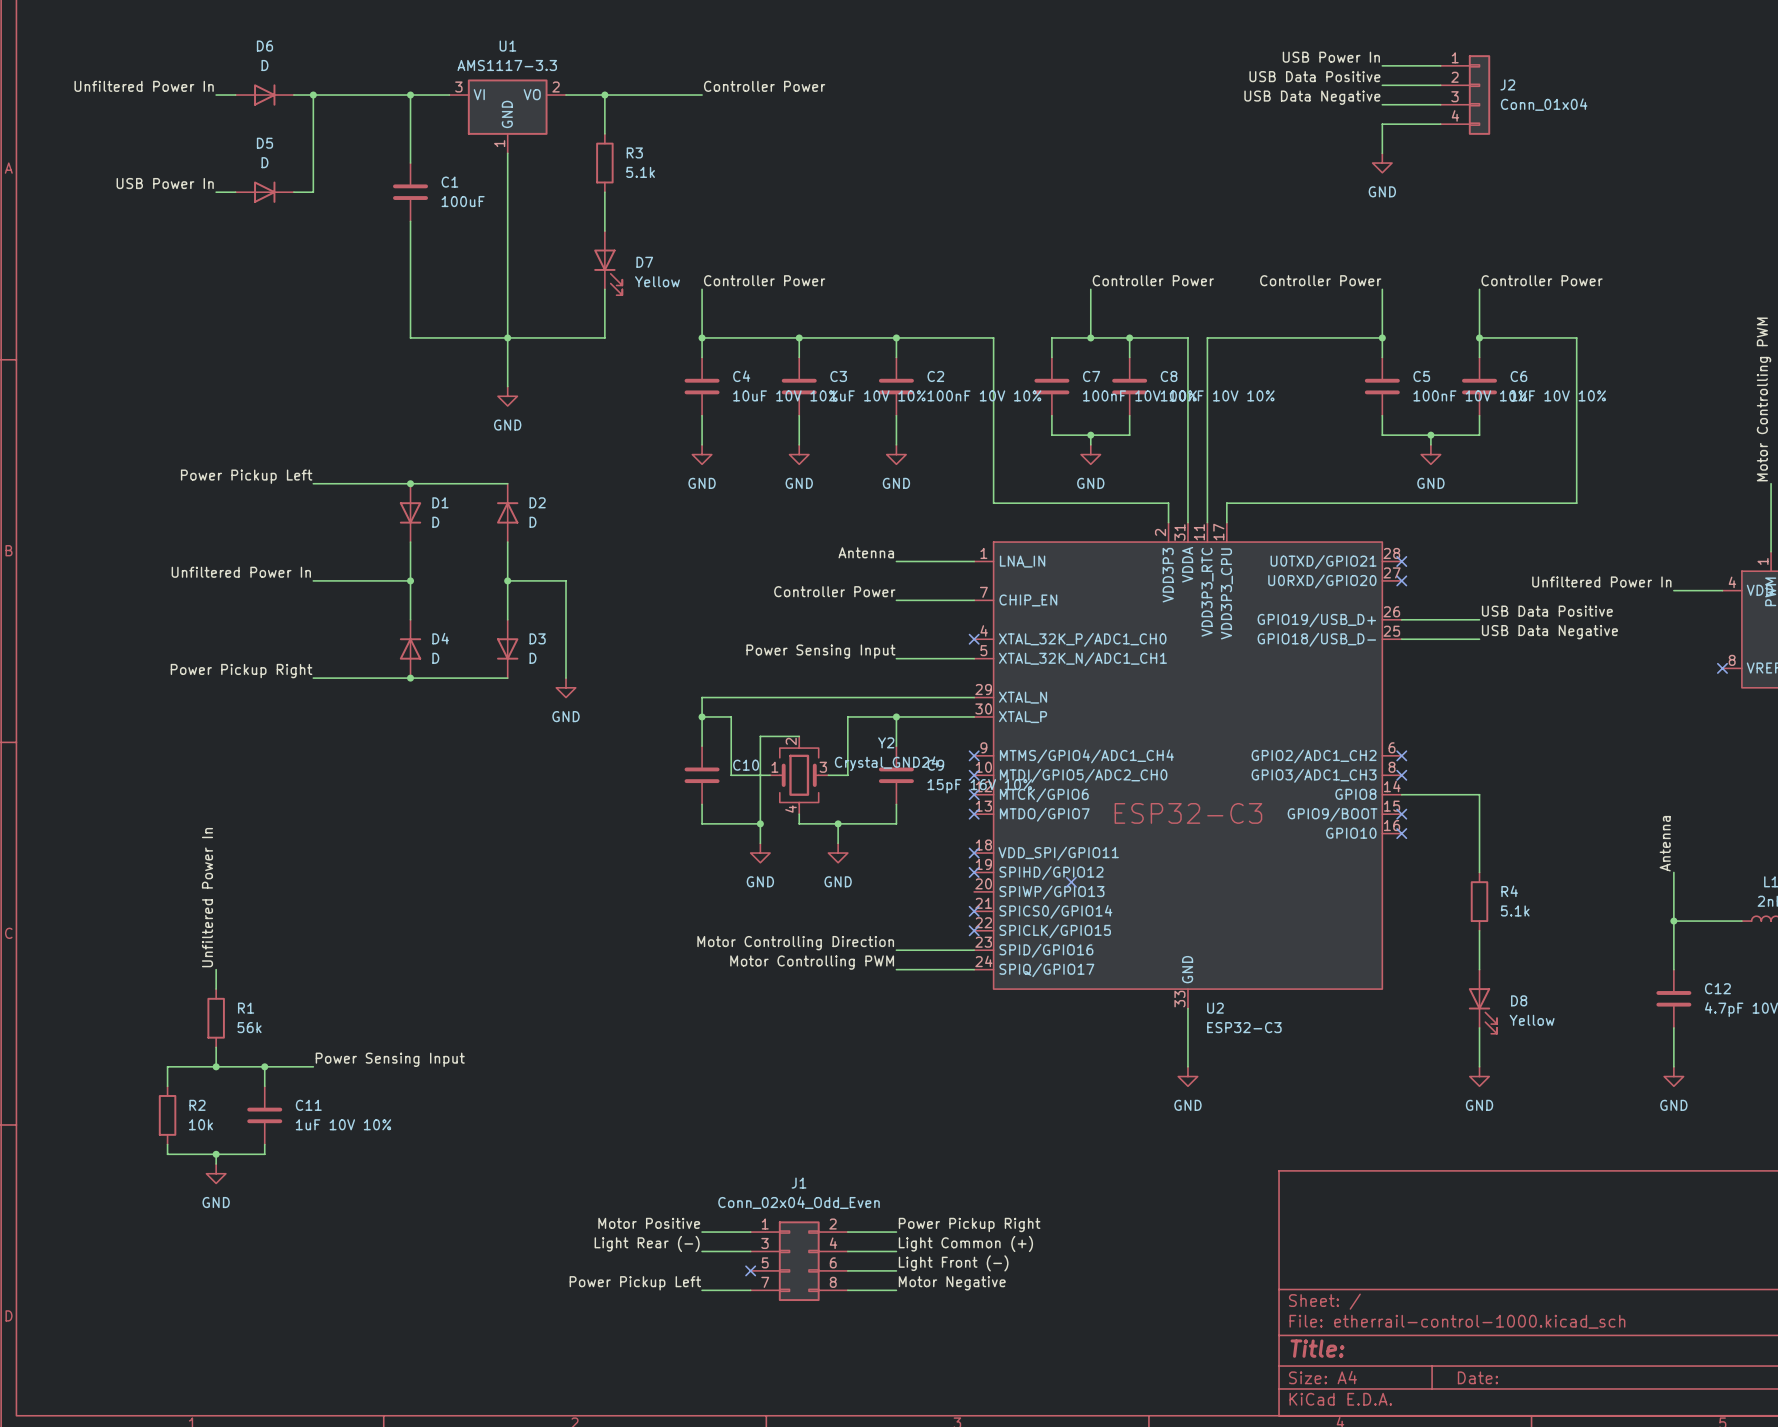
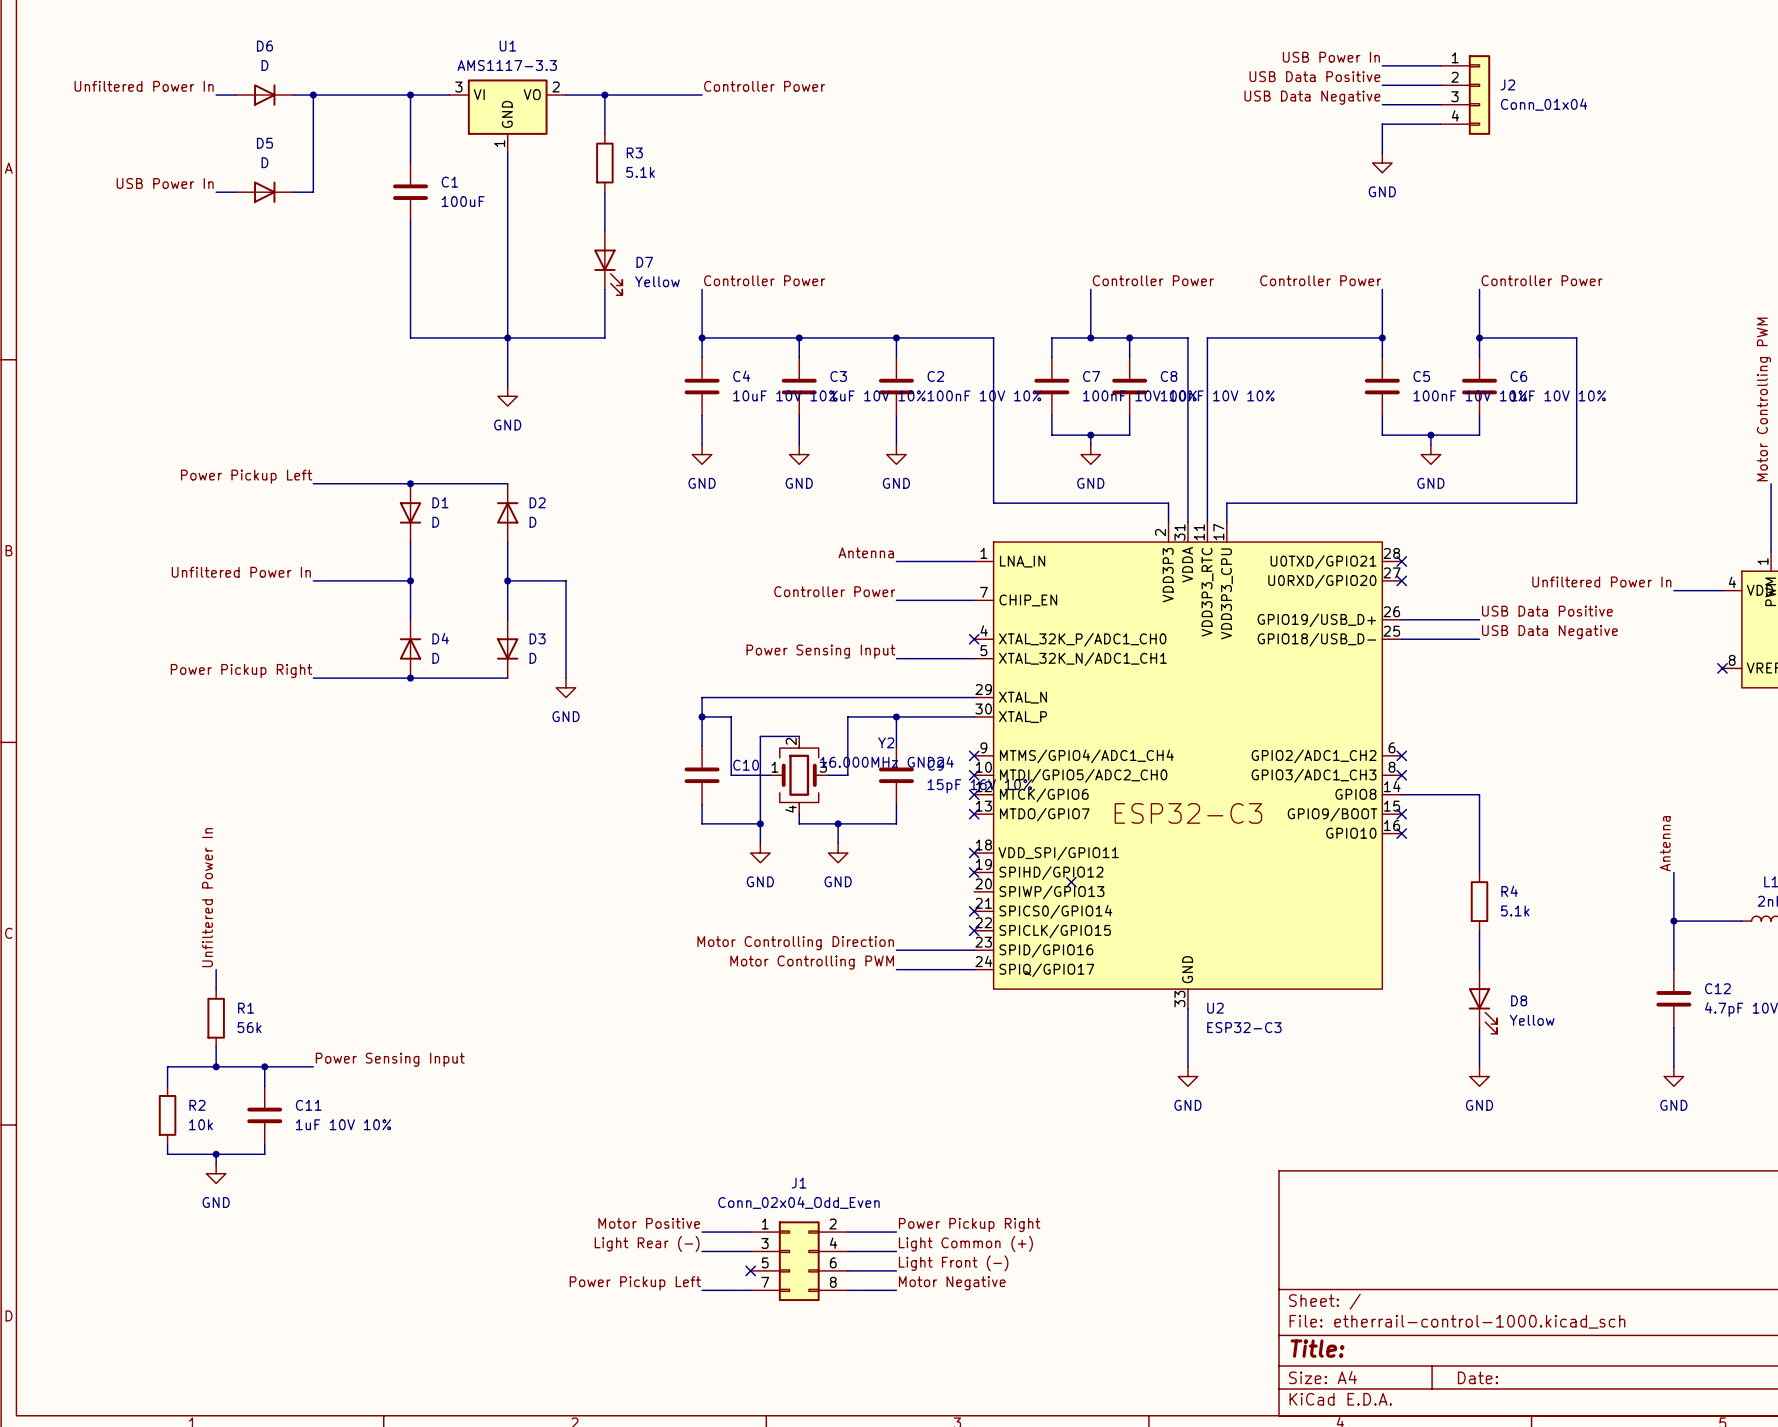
Y2 value: Crystal_GND24 (886, 763) -> 16.000MHz GND24 (886, 762)

